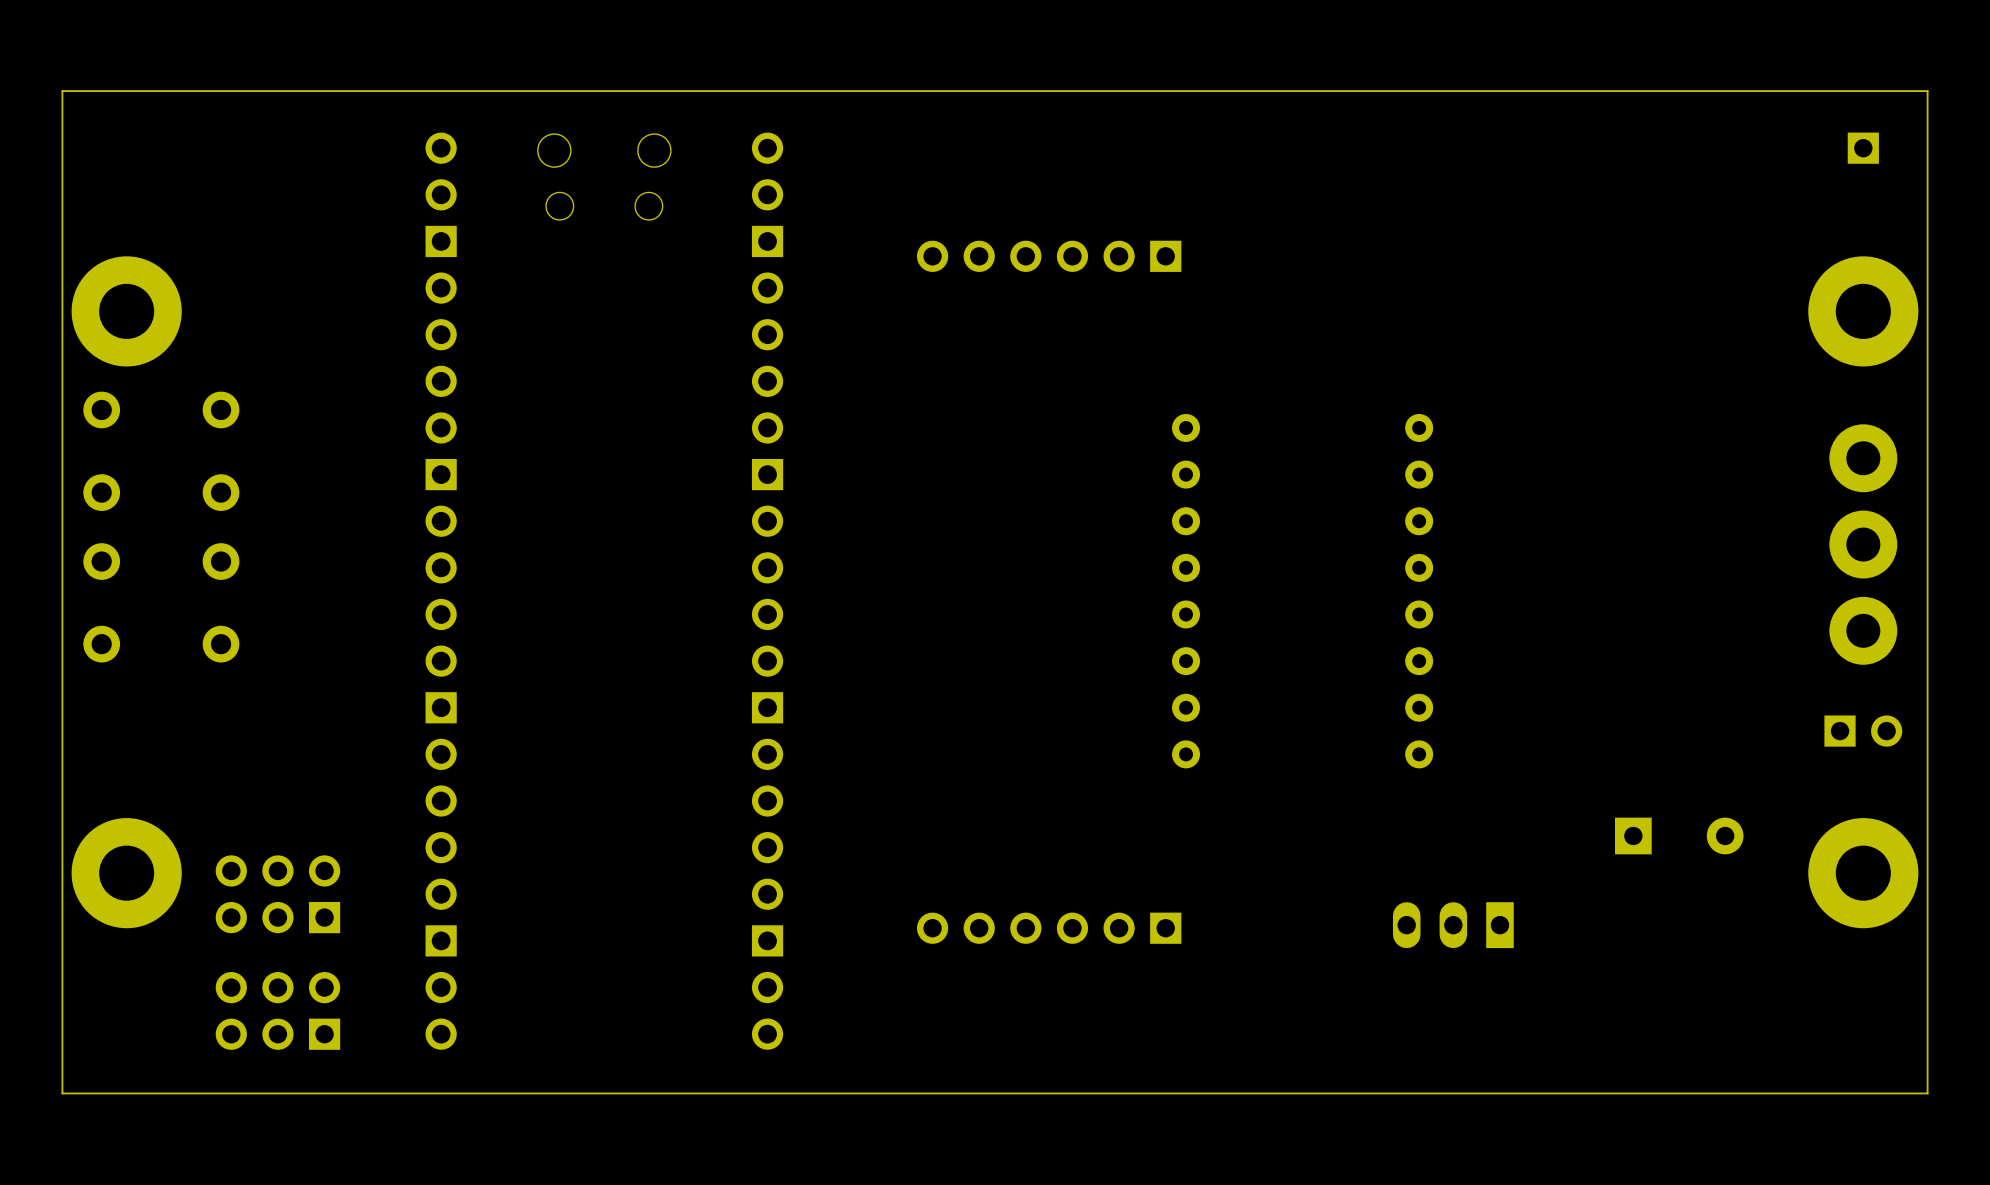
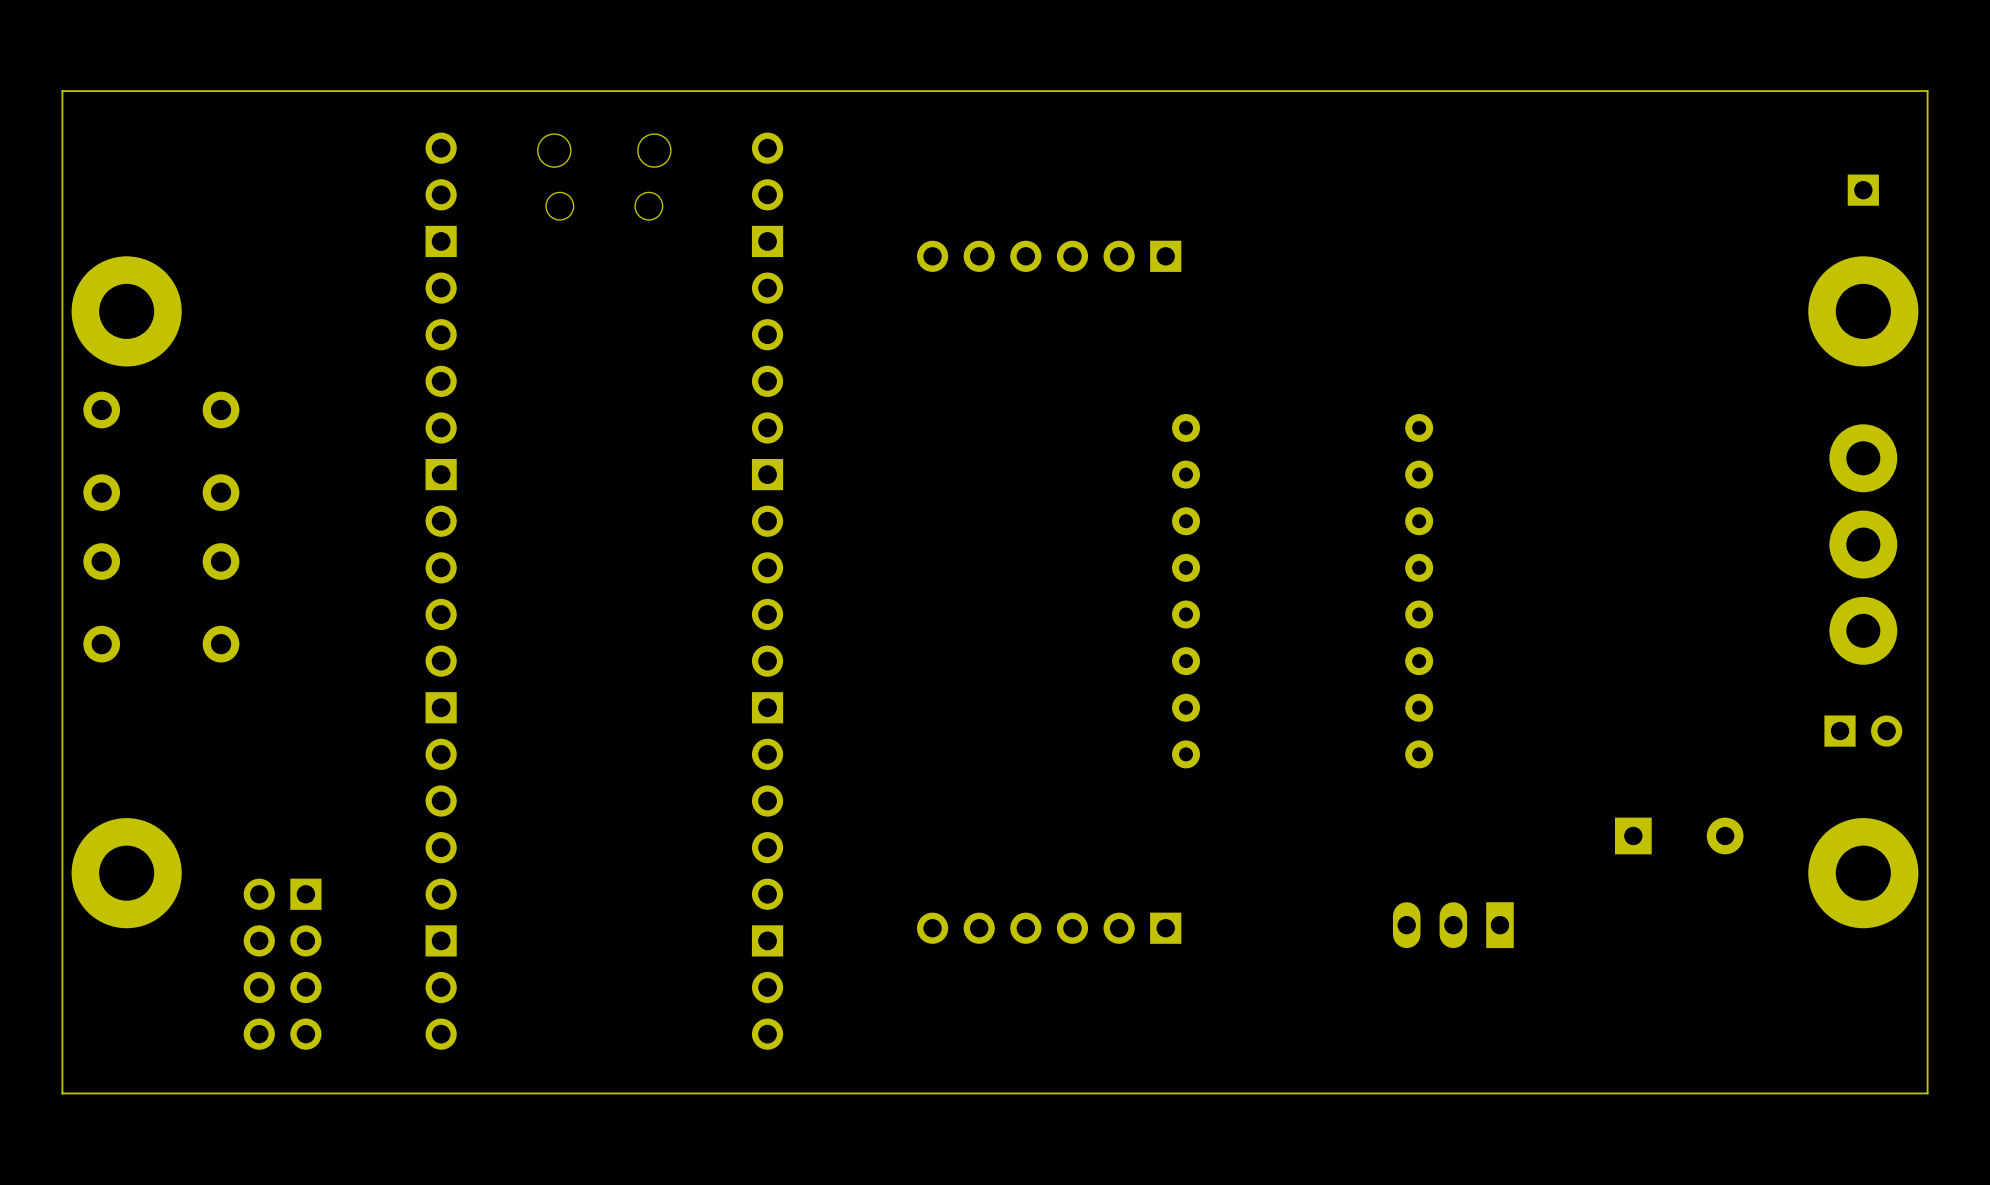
part position: (1863, 148) -> (1863, 190)
part: (277, 894) -> none
part: none -> (282, 964)
part: (277, 1010) -> none

